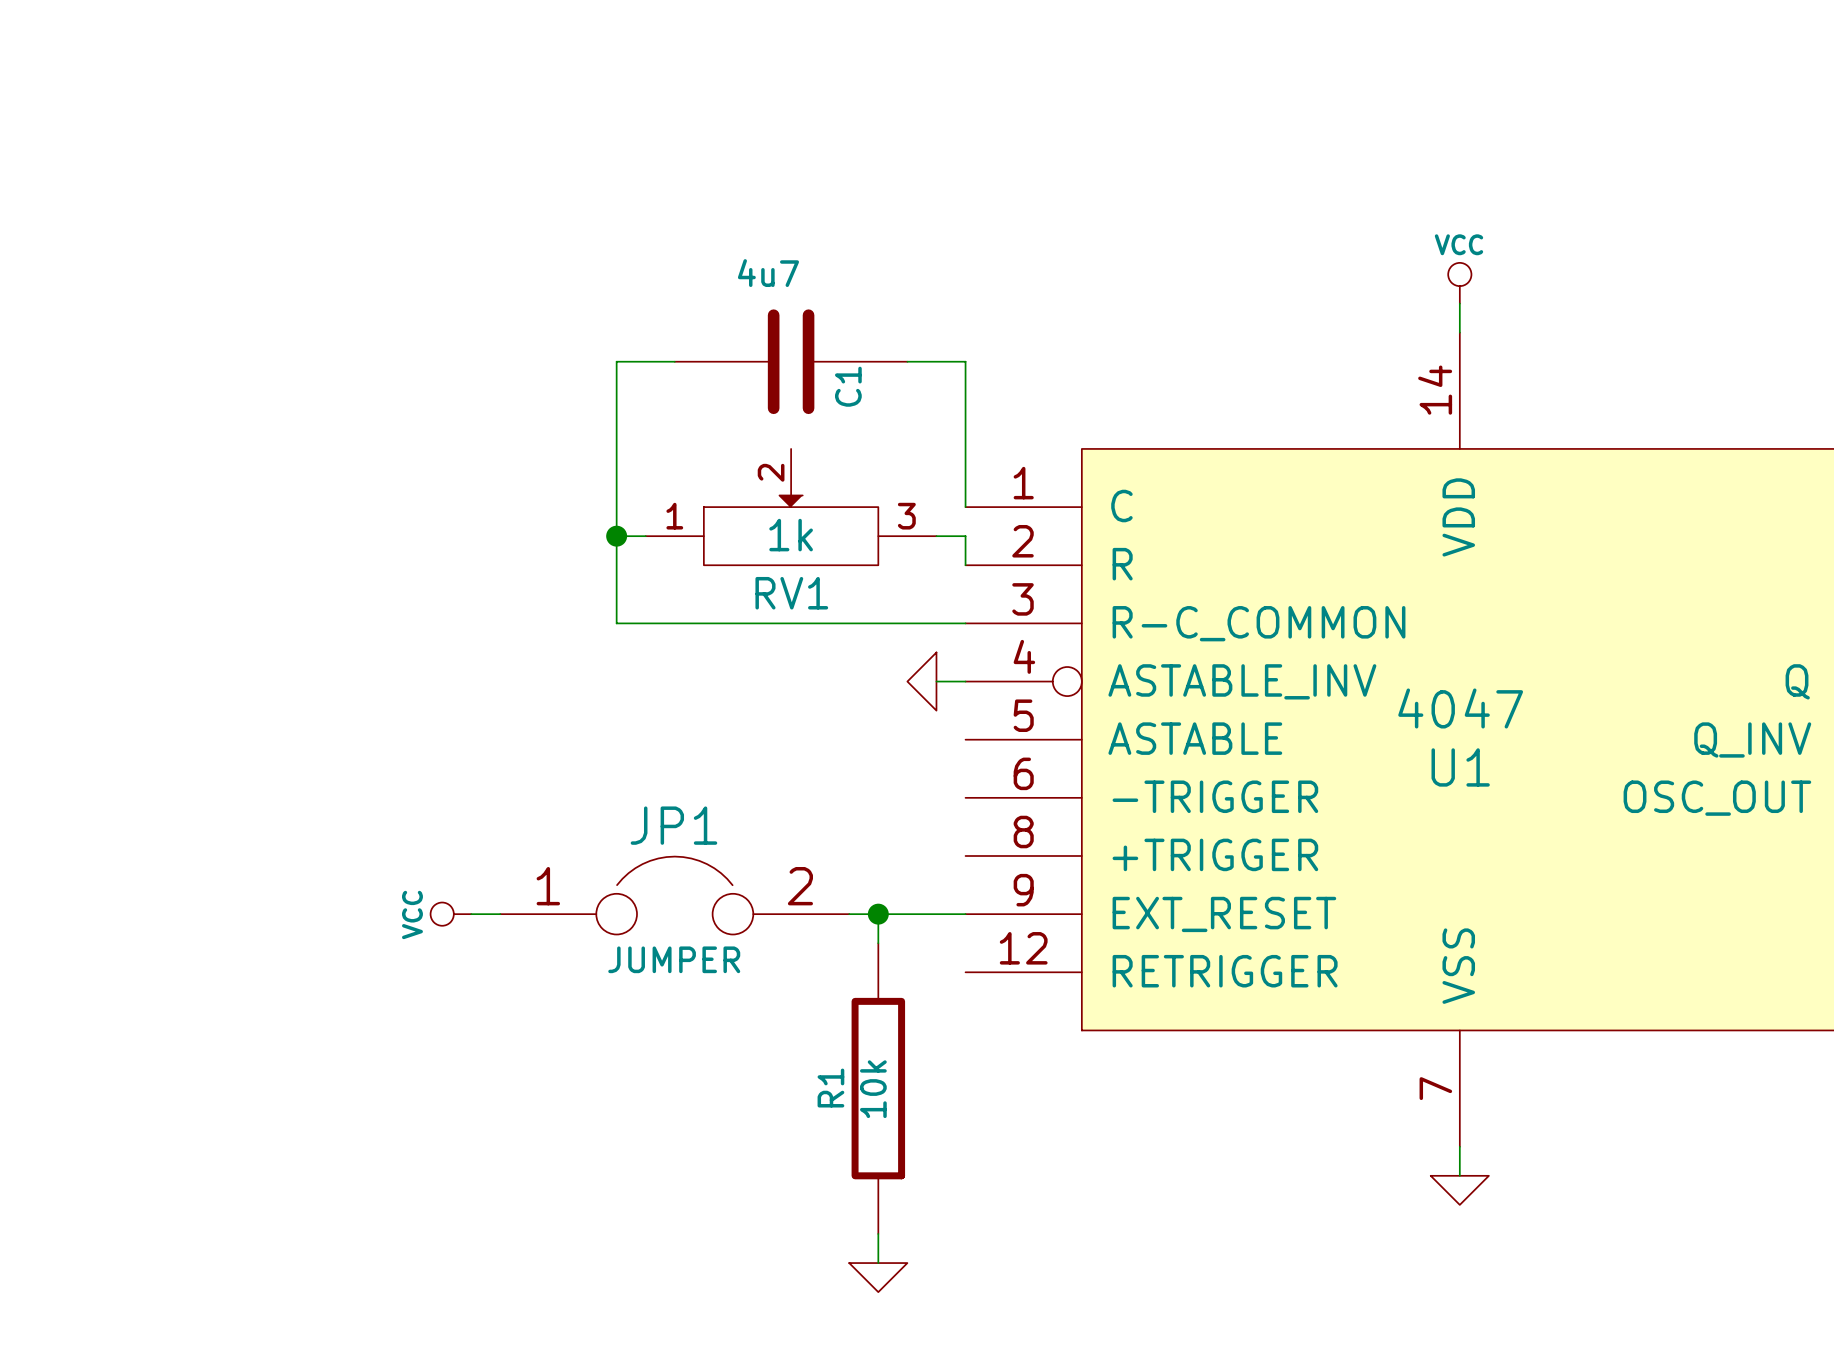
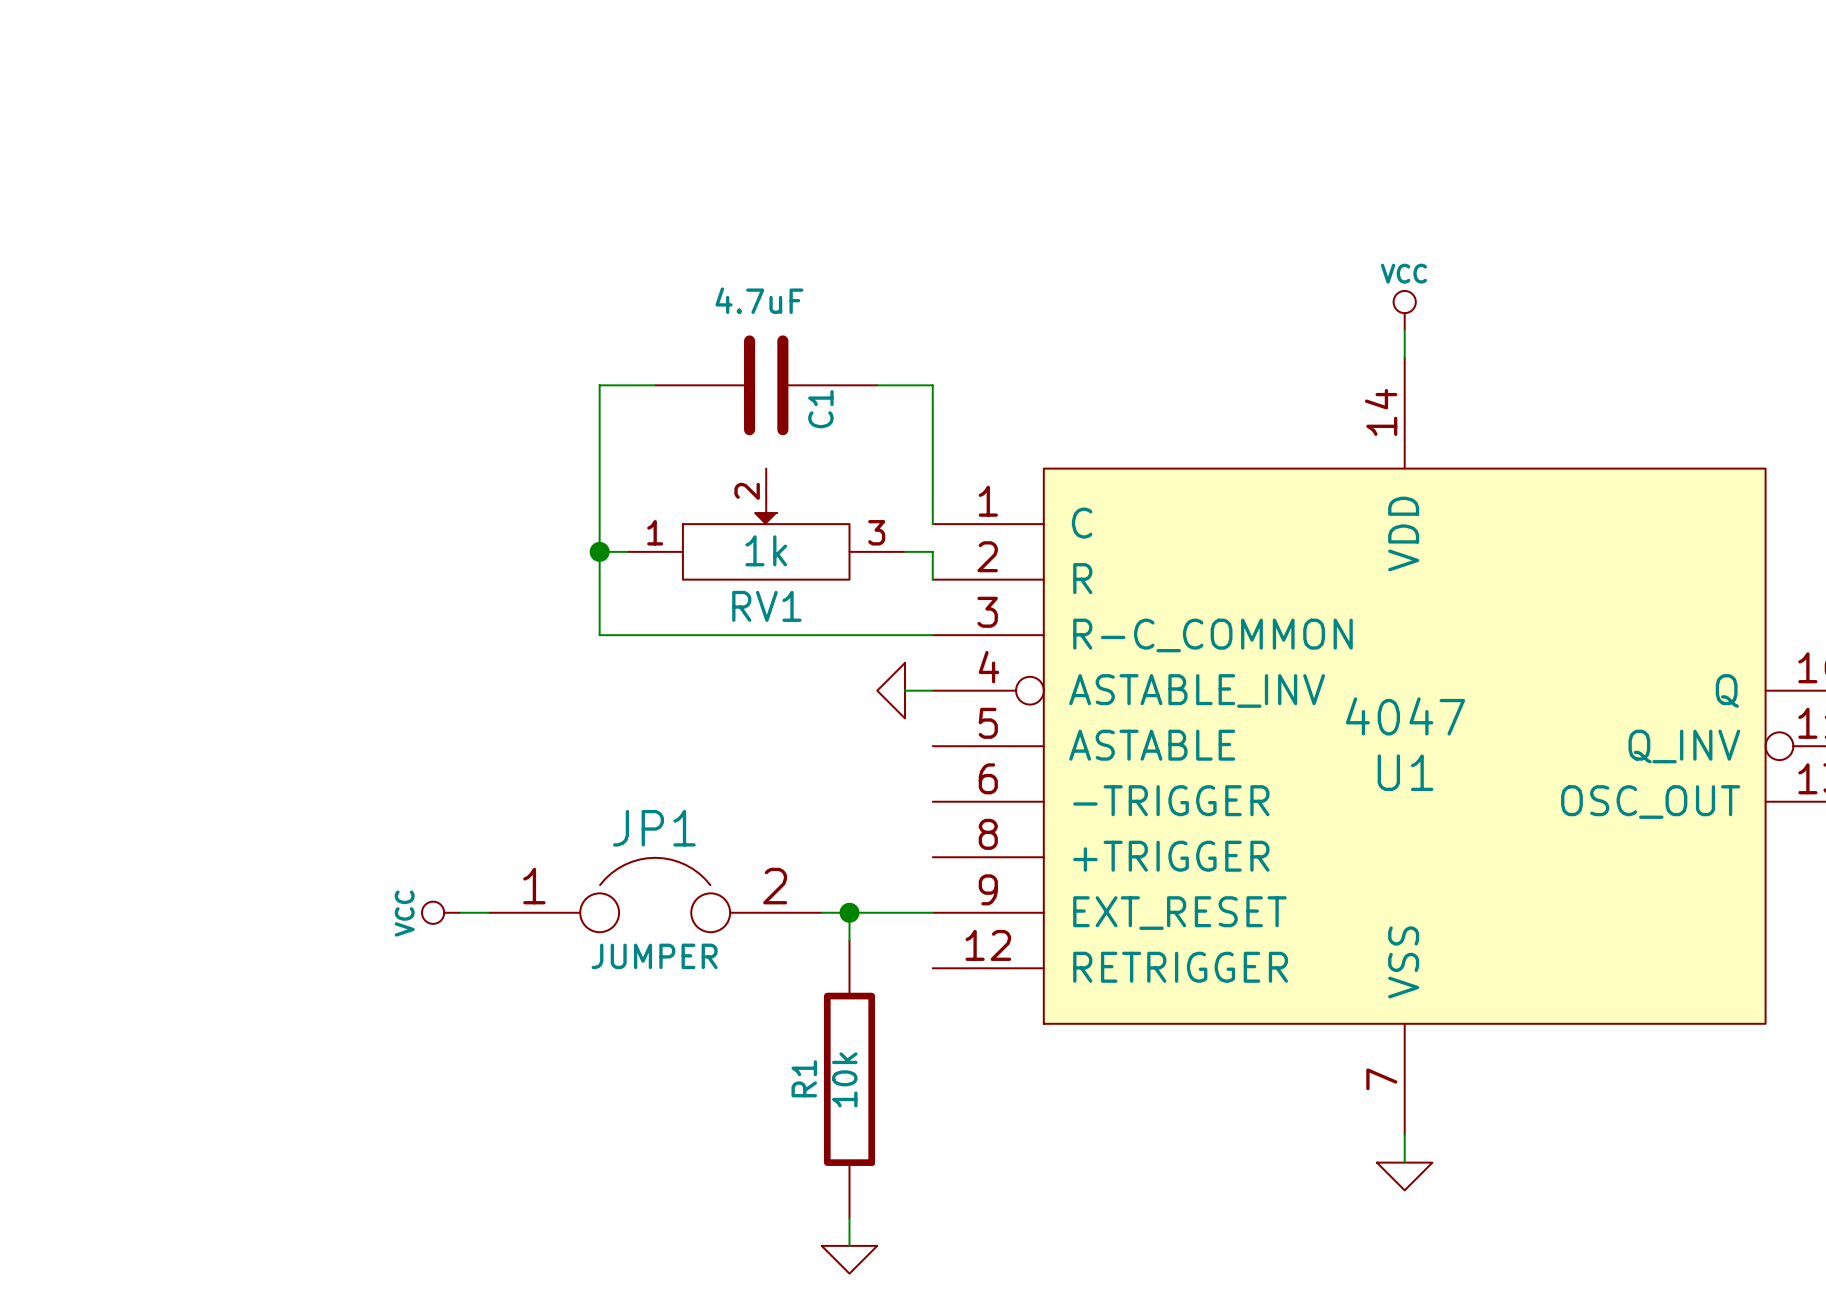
C1 value: 4u7 (768, 273) -> 4.7uF (759, 300)

